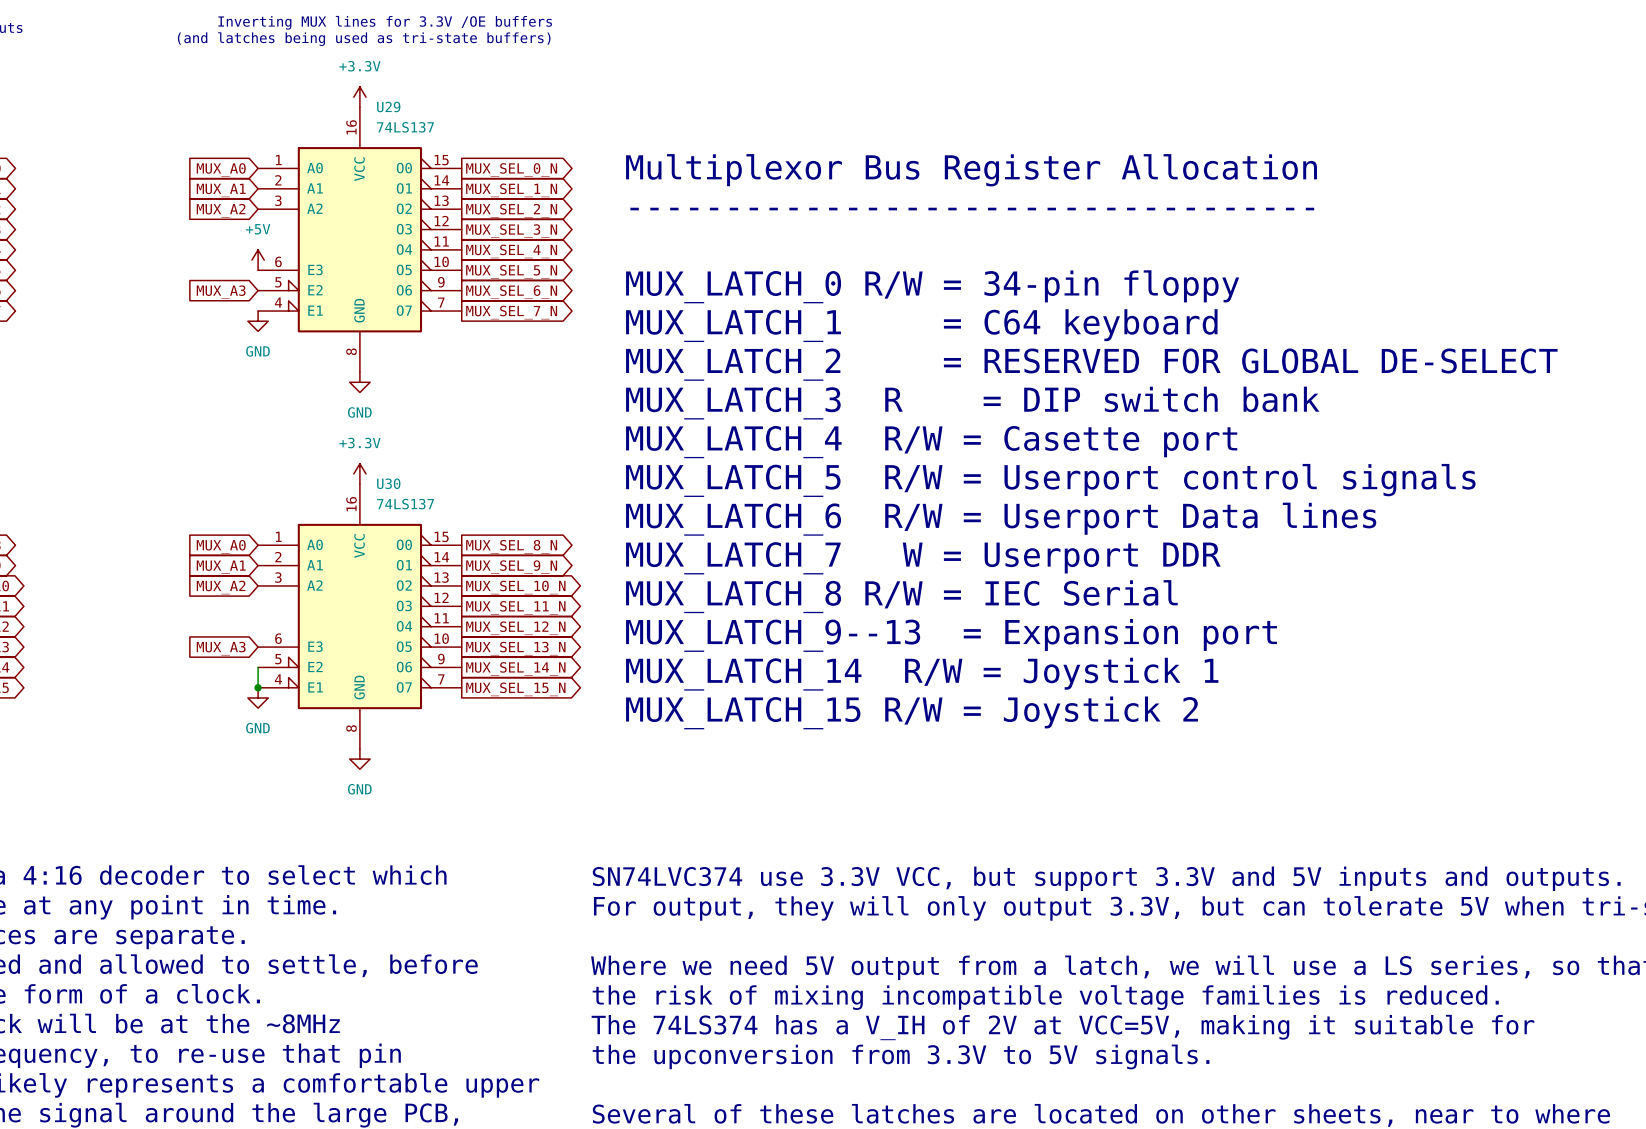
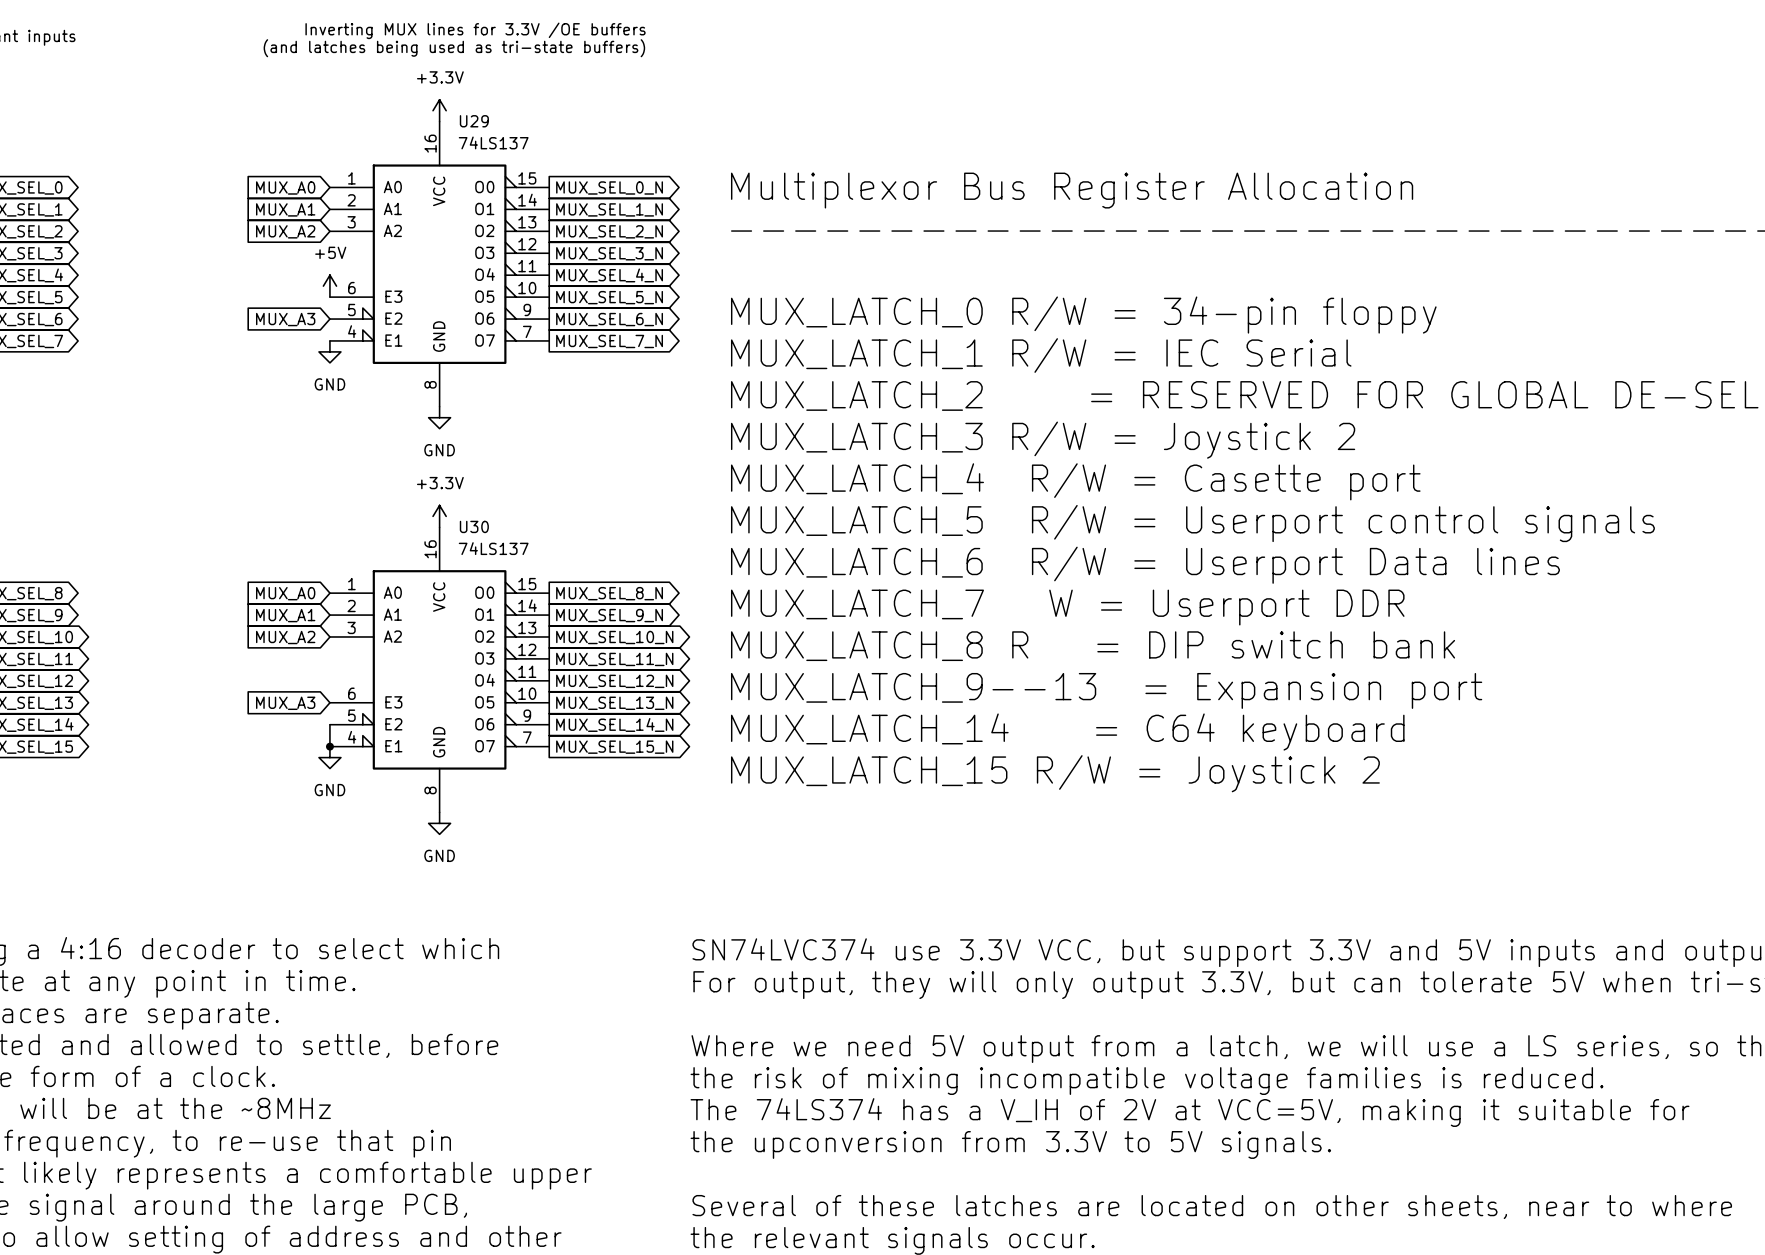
text: MUX_LATCH_1 = C64 keyboard (921, 325) -> MUX_LATCH_1 R/W = IEC Serial (1041, 355)
text: MUX_LATCH_3 R = DIP switch bank (972, 403) -> MUX_LATCH_3 R/W = Joystick 2 (1043, 440)
text: MUX_LATCH_8 R/W = IEC Serial (901, 596) -> MUX_LATCH_8 R = DIP switch bank (1093, 646)
text: MUX_LATCH_14 R/W = Joystick 1 (922, 674) -> MUX_LATCH_14 = C64 keyboard (1067, 732)

